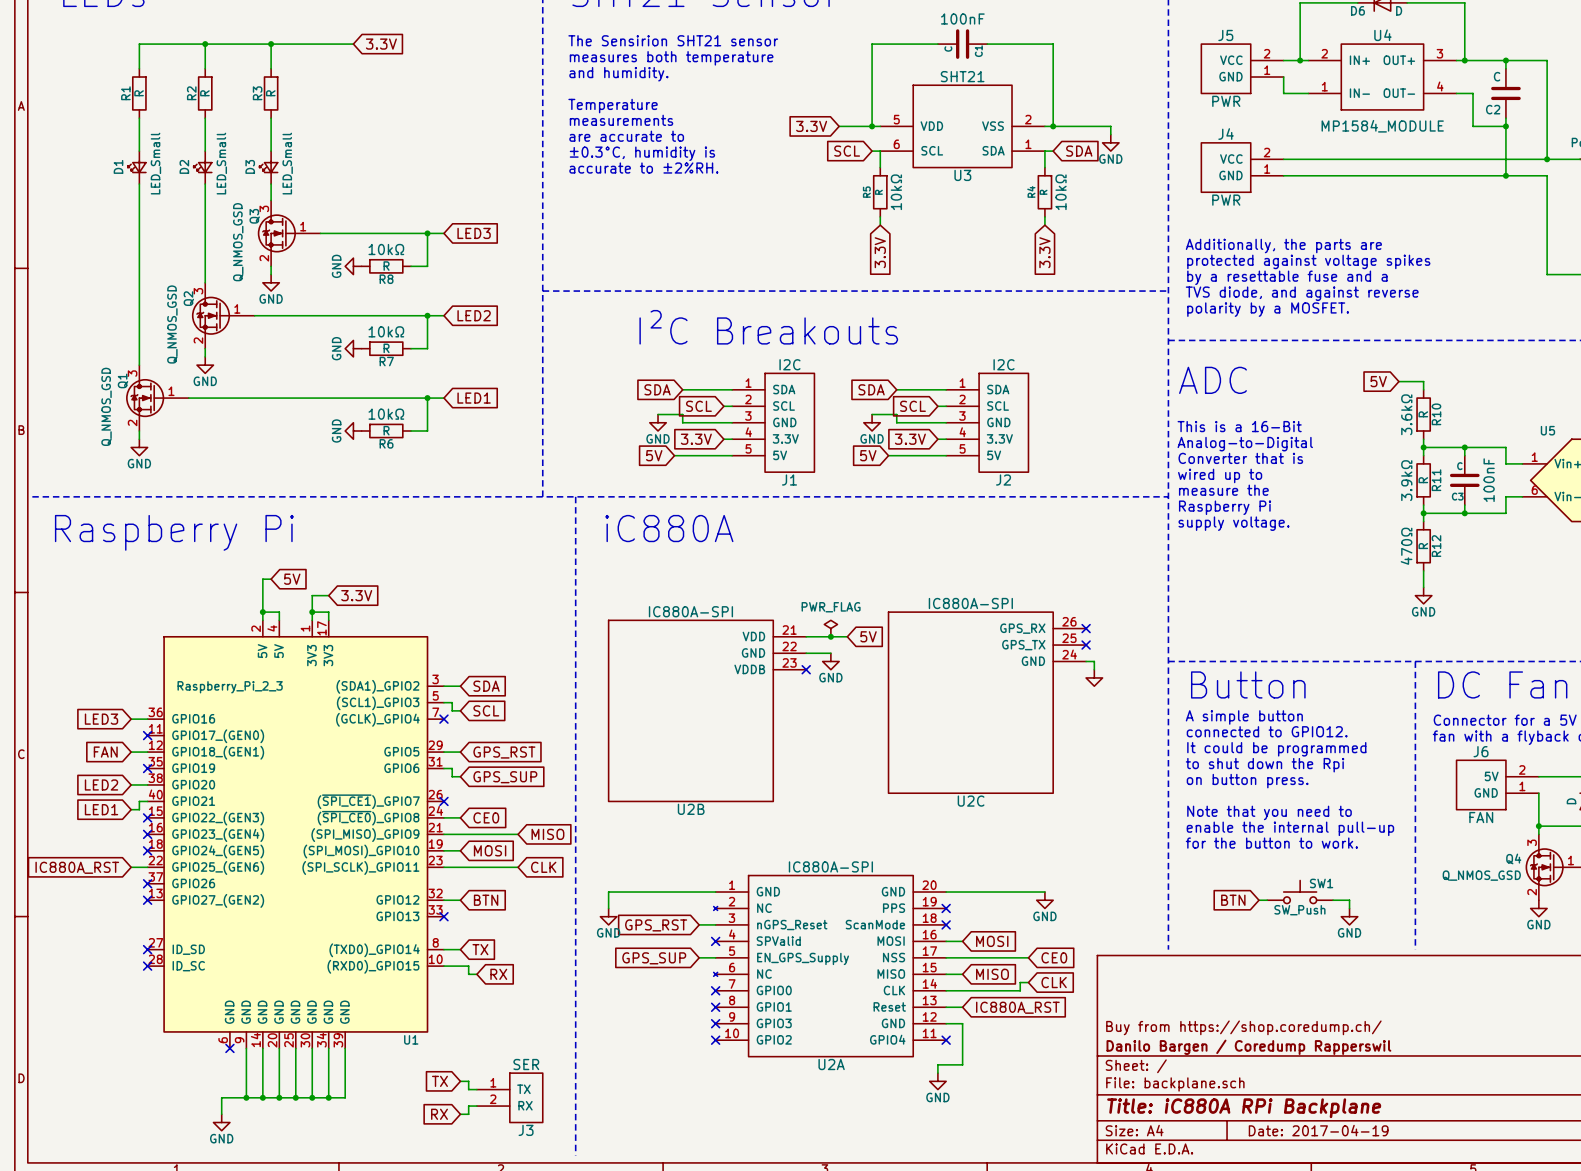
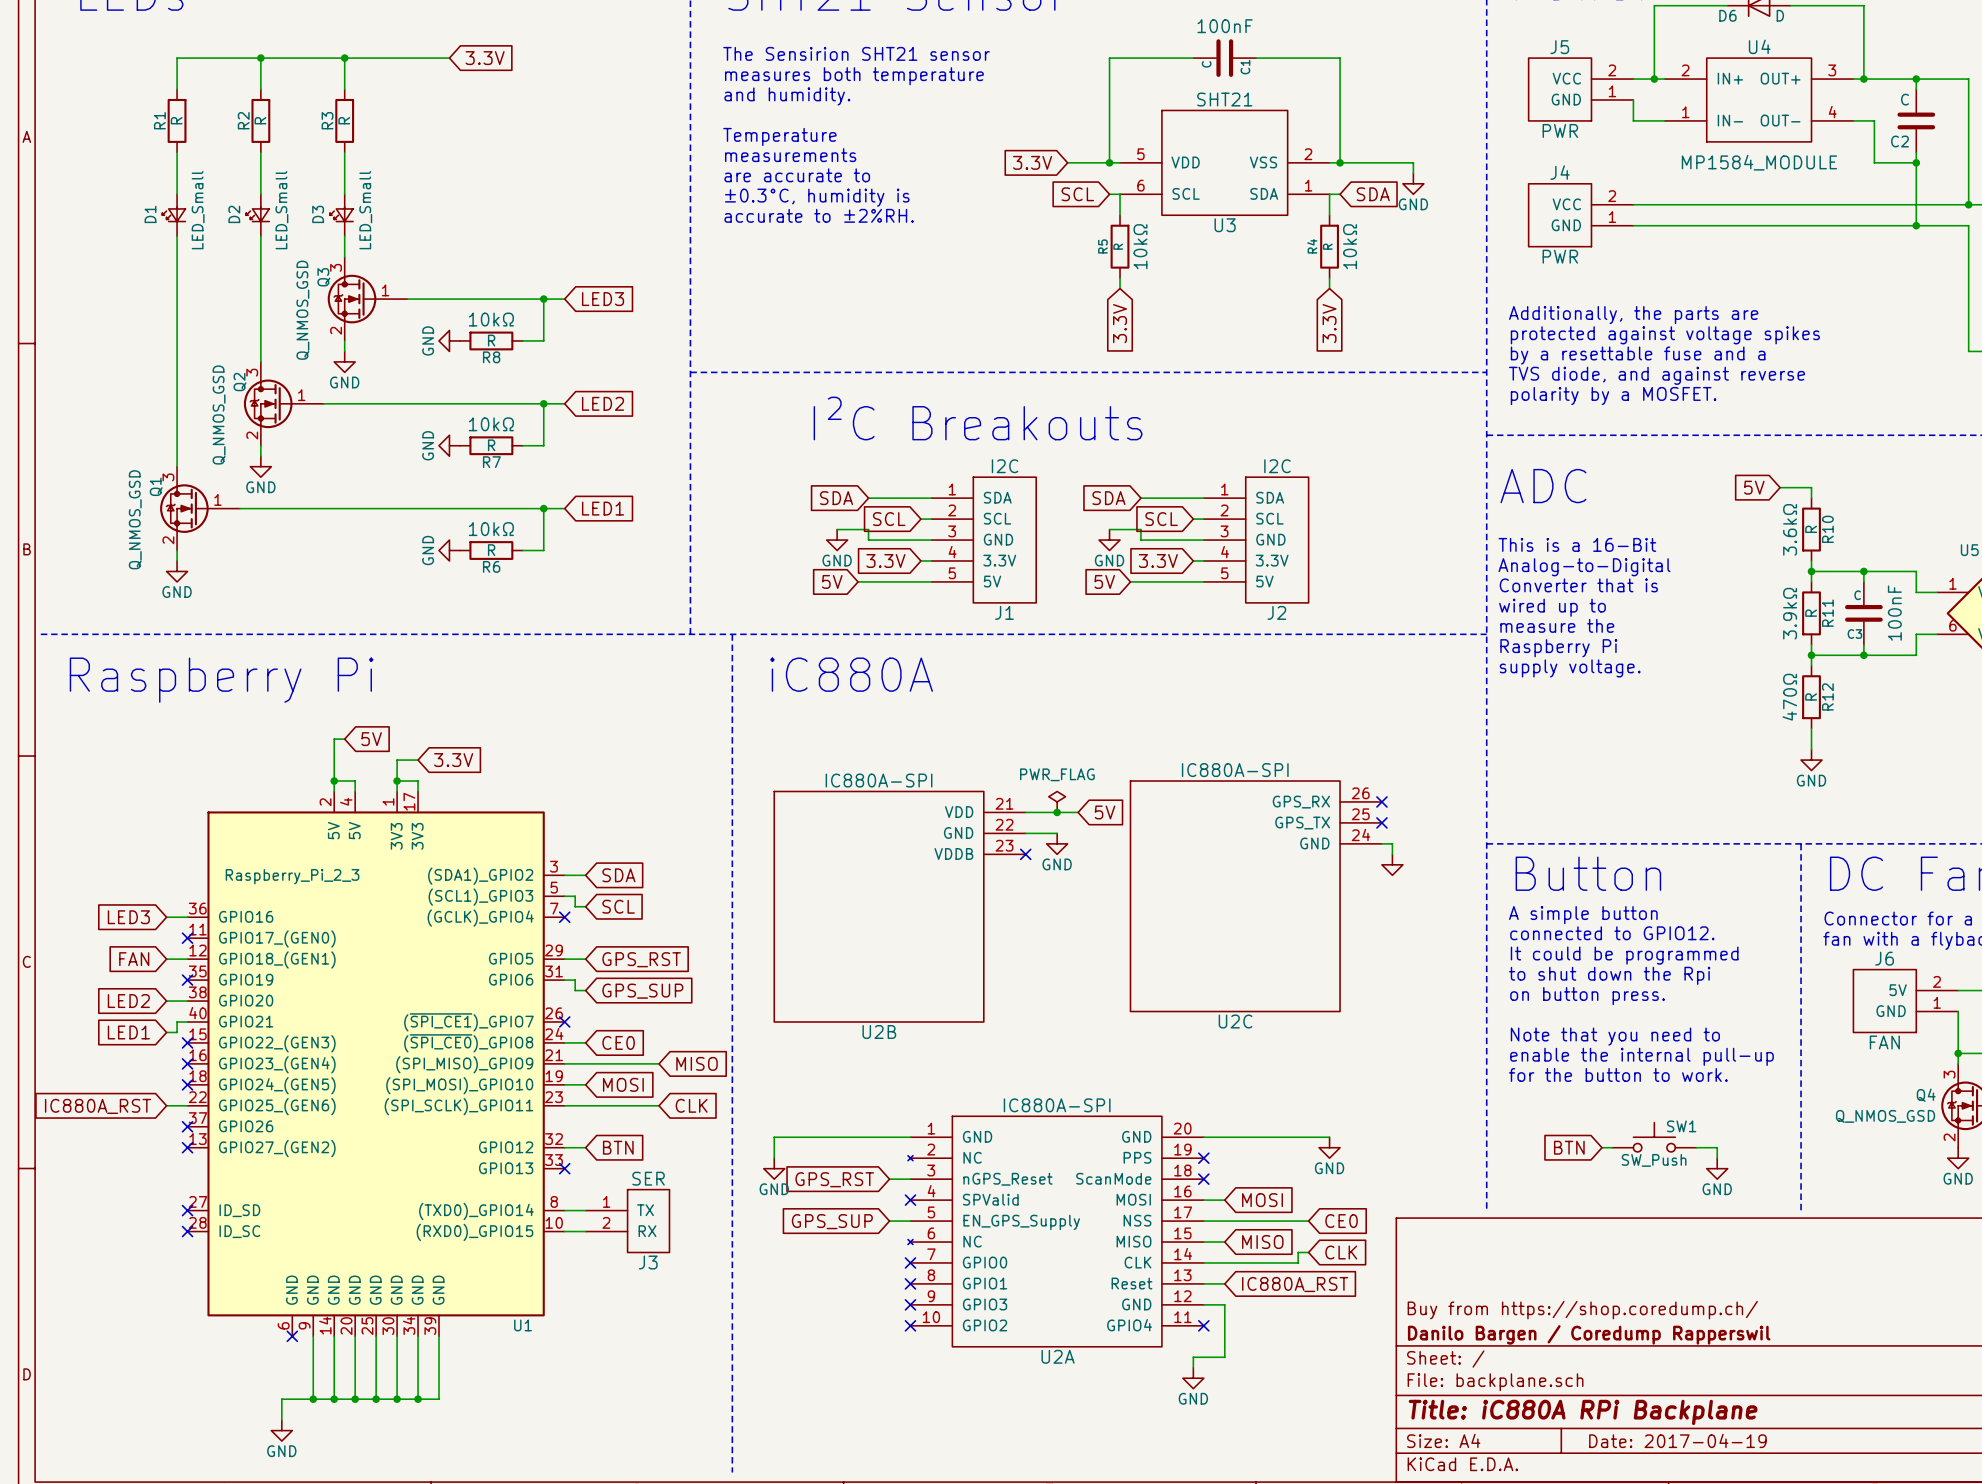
global label: TX (480, 949) -> none
wire: (460, 966) (468, 966) (468, 974) (476, 974) -> none
global label: RX (498, 974) -> none
global label: TX (439, 1081) -> none
wire: (460, 1081) (468, 1081) (468, 1089) (476, 1089) -> none
J3 position: (509, 1097) -> (627, 1221)
wire: (476, 1106) (468, 1106) (468, 1114) (460, 1114) -> none
global label: RX (439, 1114) -> none

